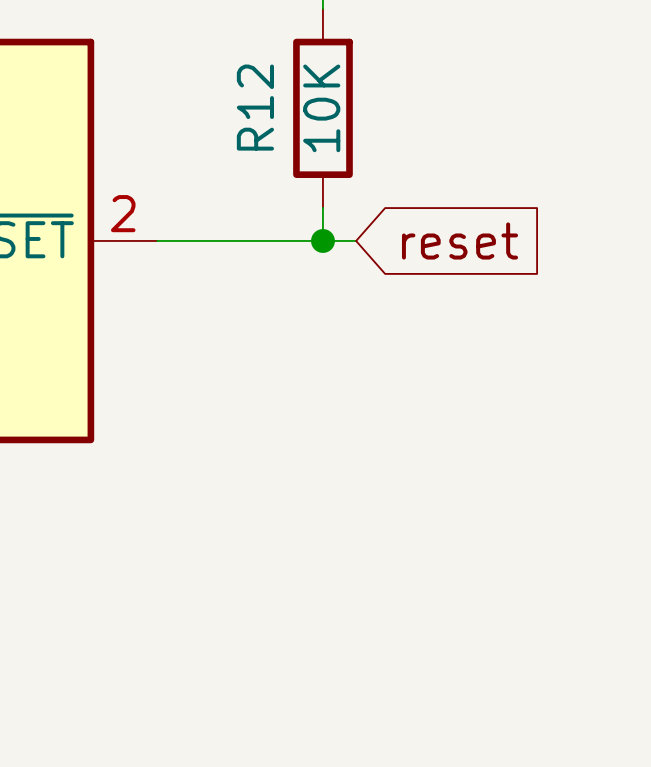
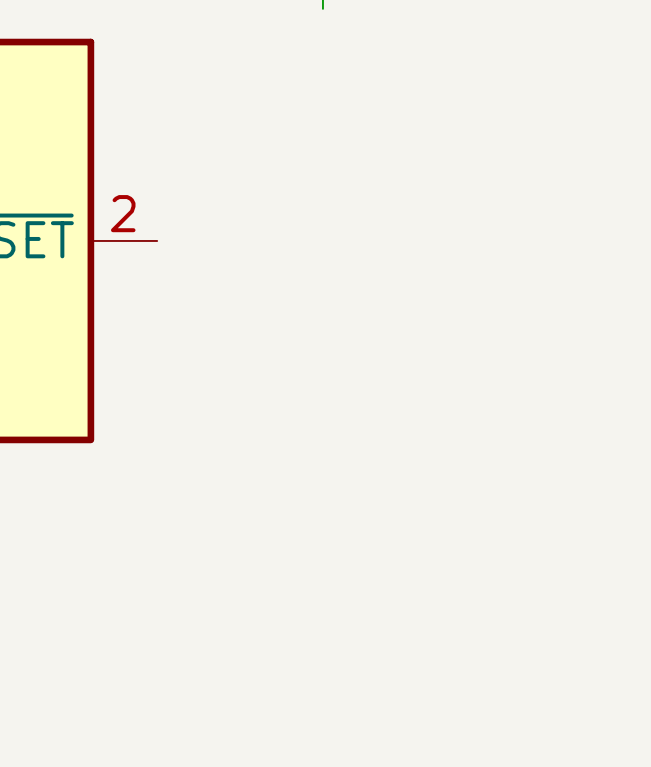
R12: 10K (322, 108) -> none
wire: (322, 207) (322, 240) -> none
wire: (157, 240) (356, 240) -> none
junction: (322, 240) -> none
global label: reset (459, 240) -> none

